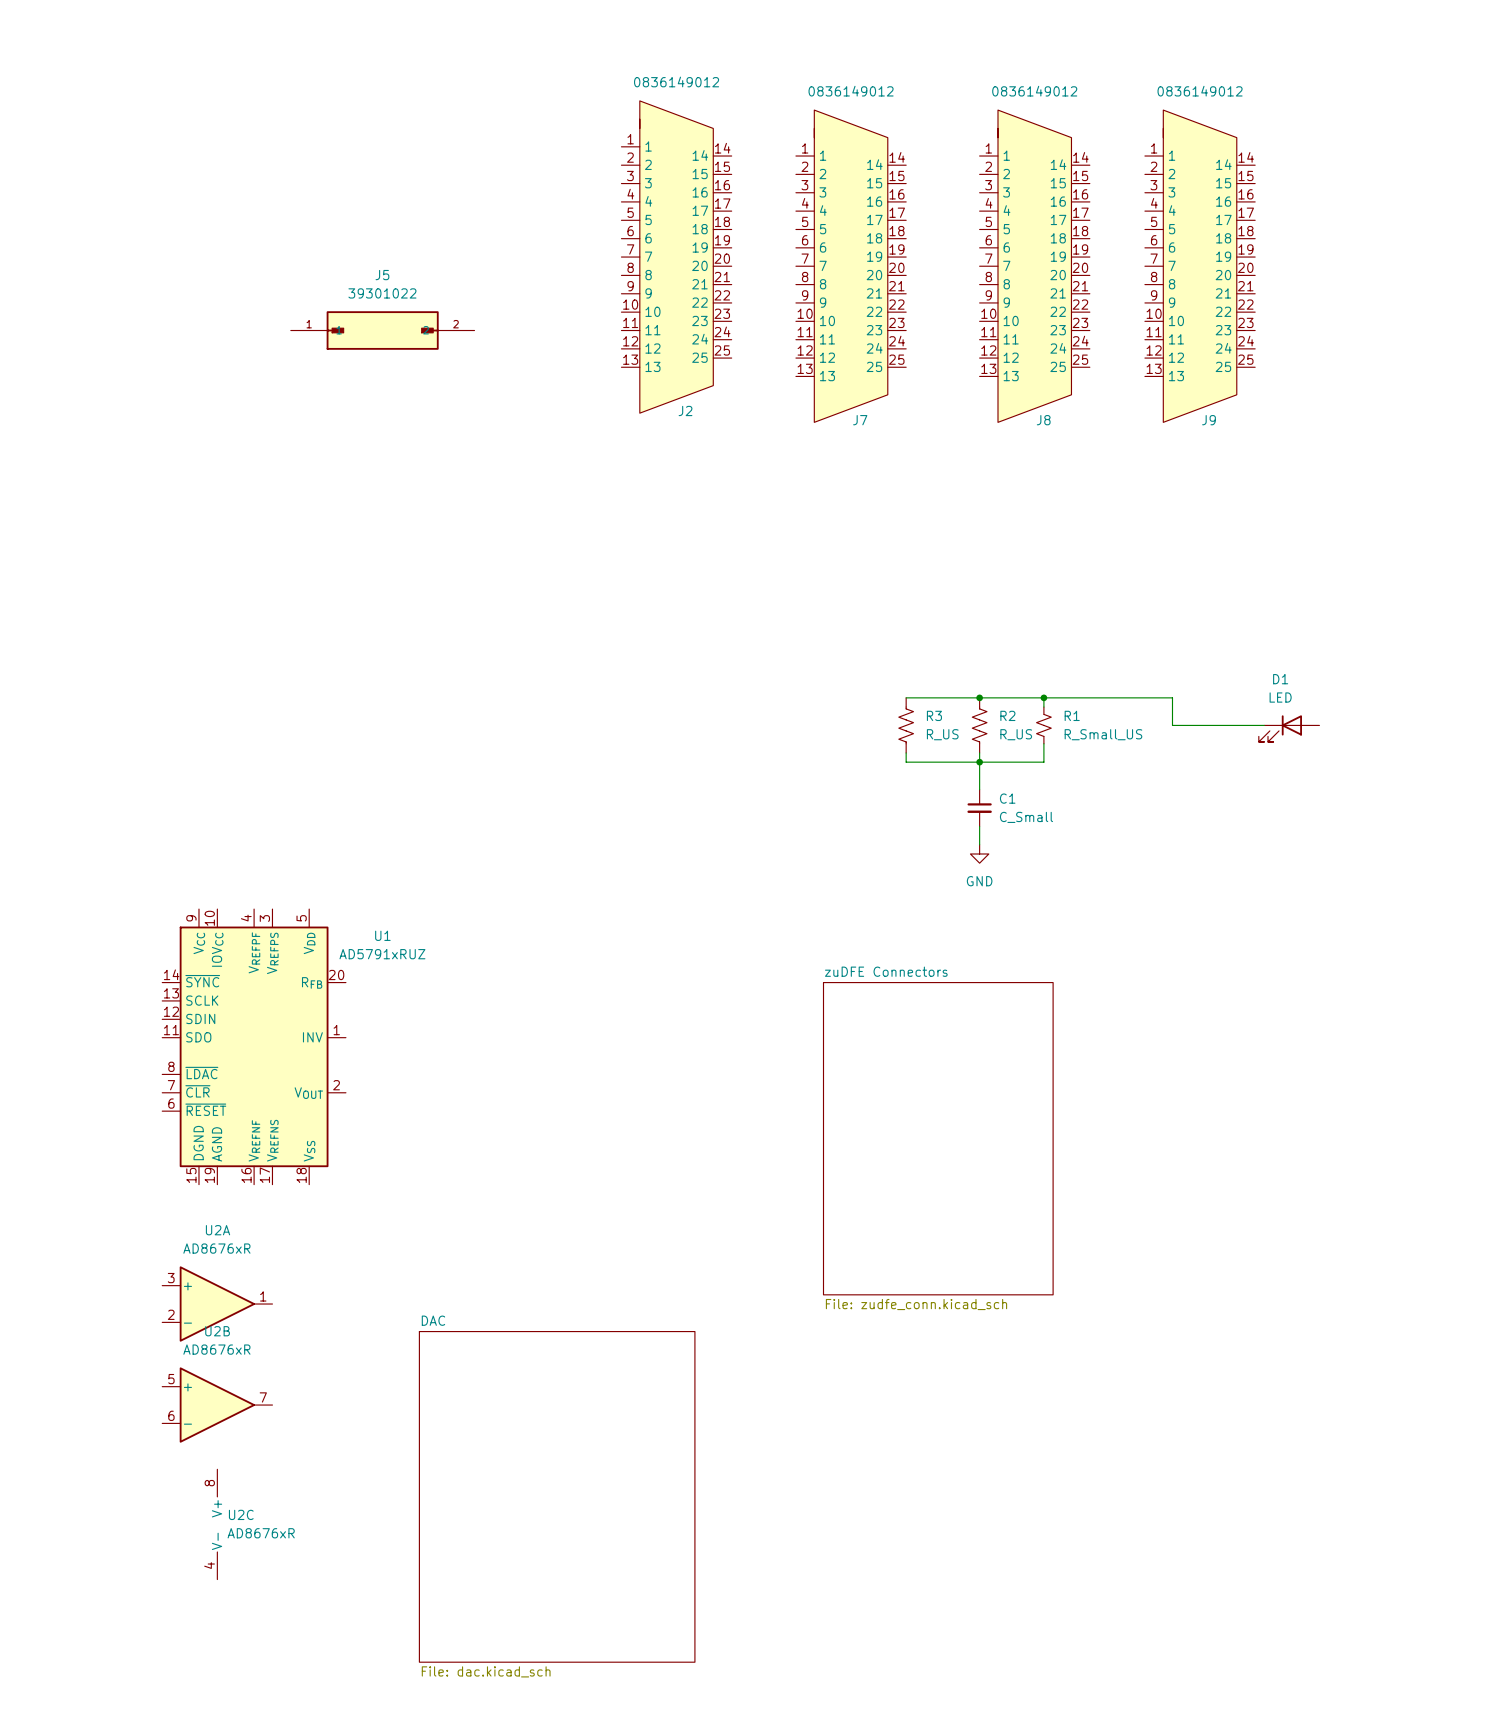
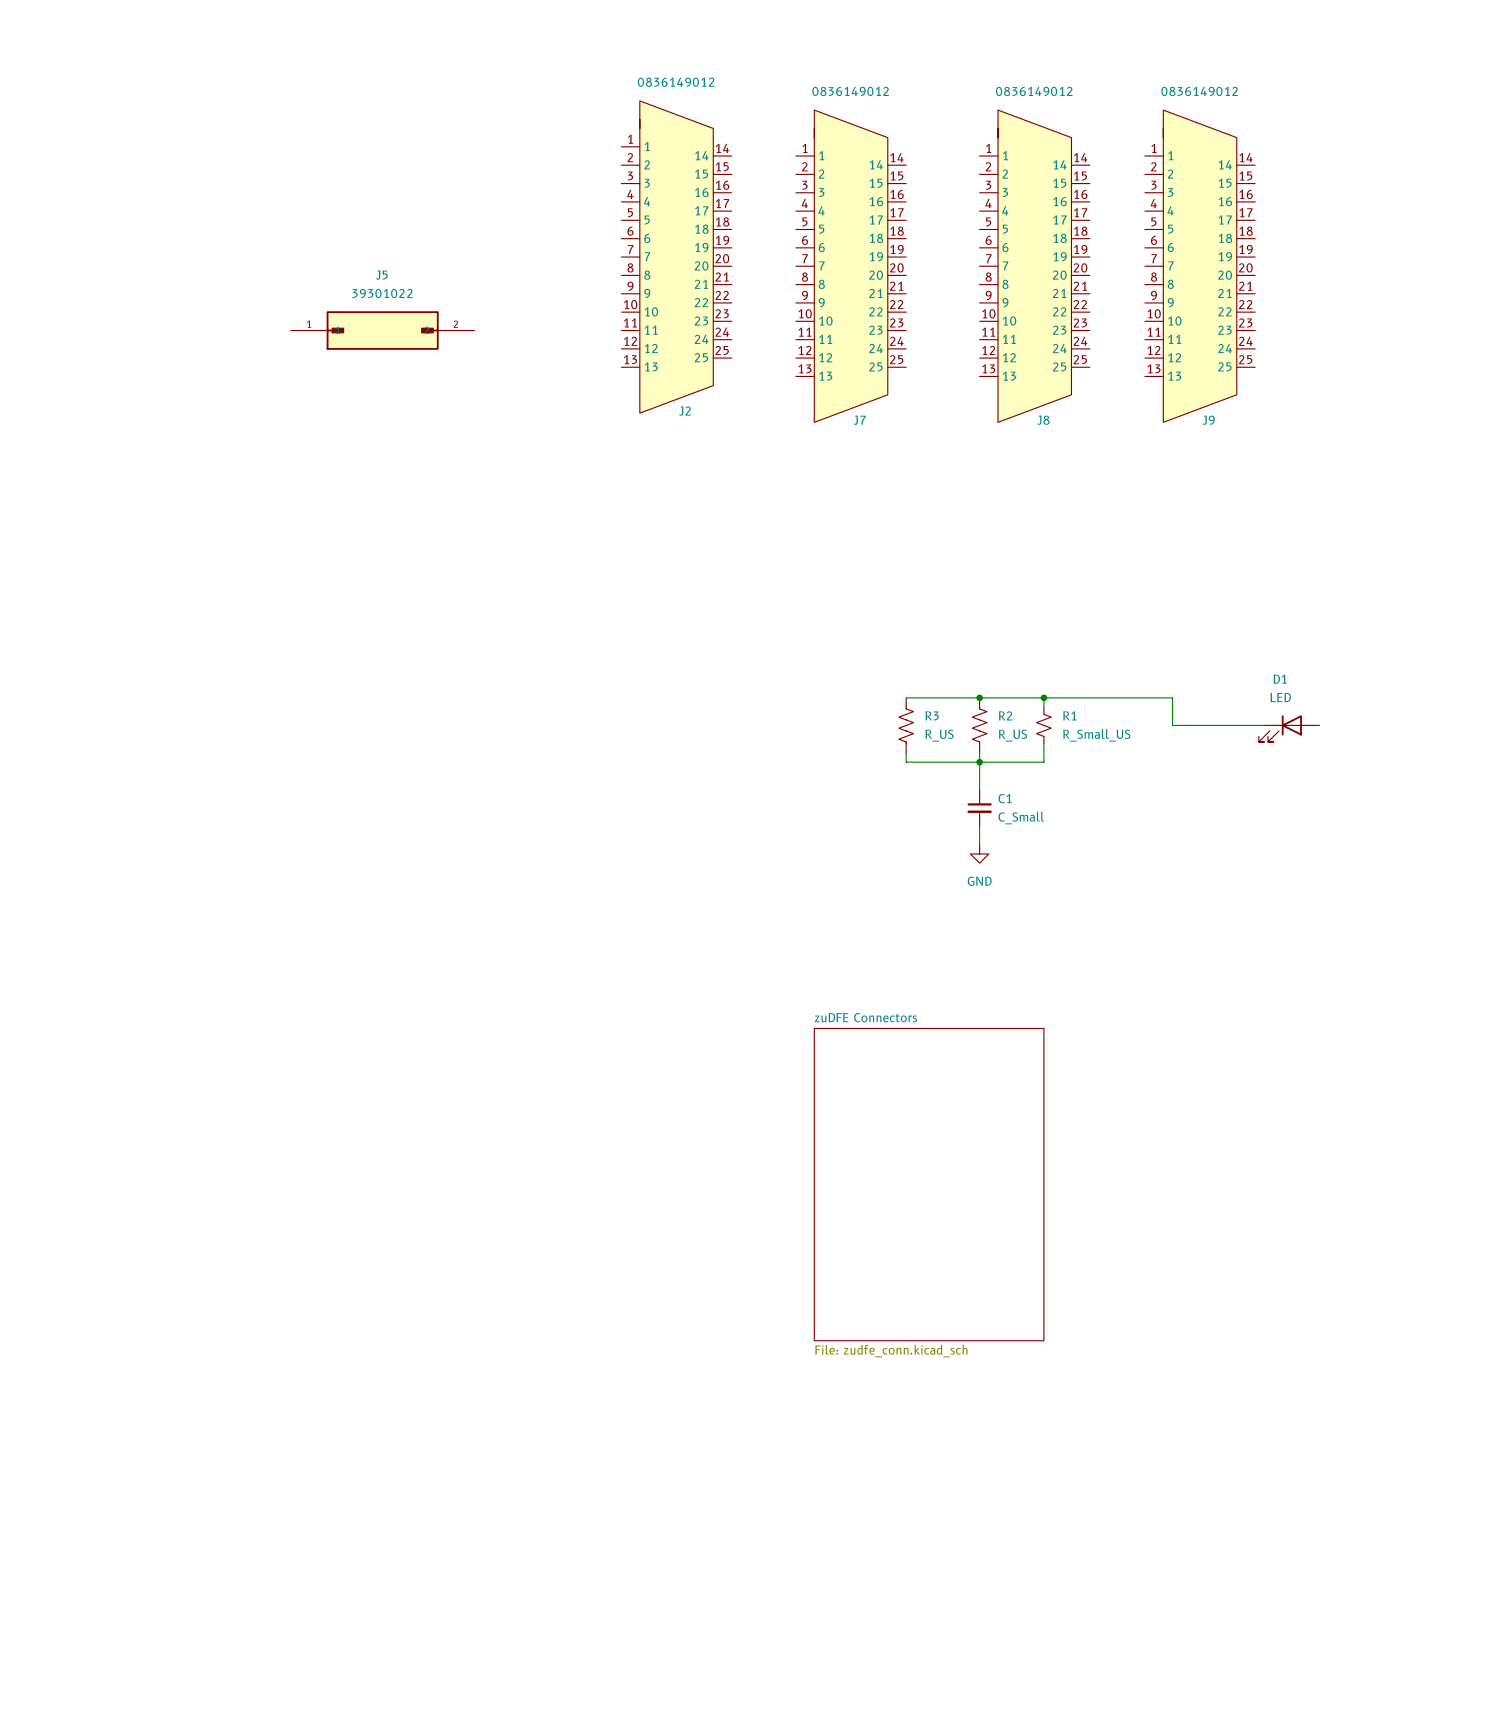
U1: AD5791xRUZ (254, 1046) -> none
sheet zuDFE Connectors position: (938, 1138) -> (929, 1184)
U2A: AD8676xR (217, 1304) -> none
U2B: AD8676xR (217, 1405) -> none
sheet DAC: File: dac.kicad_sch (557, 1496) -> none
U2C: AD8676xR (217, 1524) -> none

